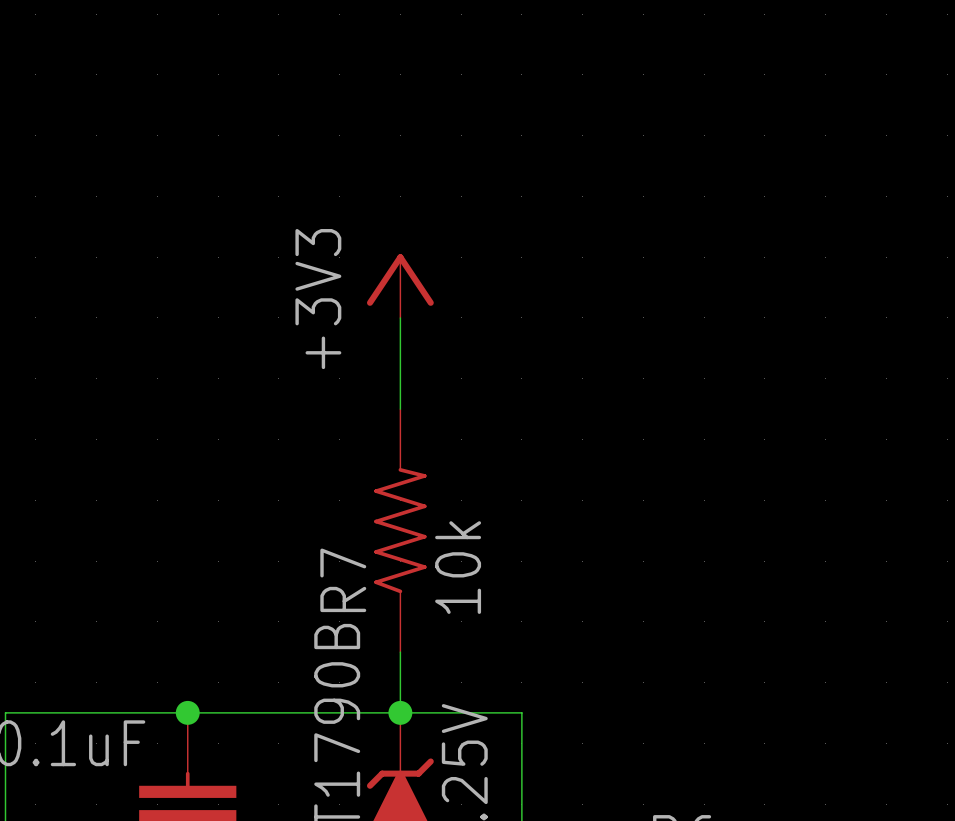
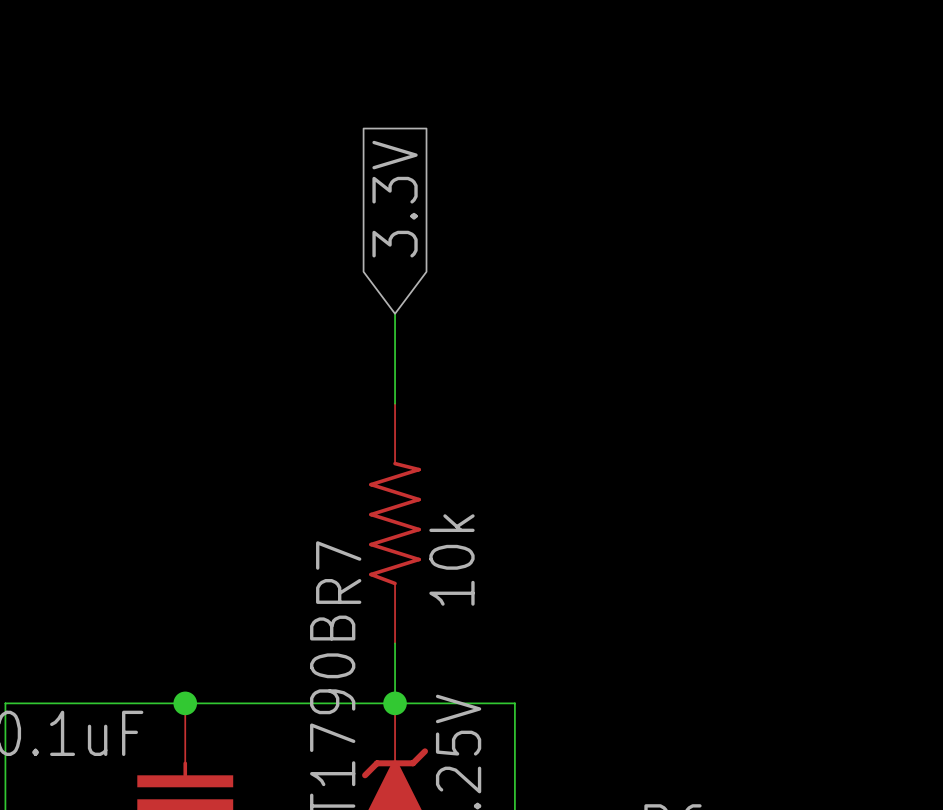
global label: none -> 3.3V (395, 199)
power symbol: +3V3 (400, 286) -> none

